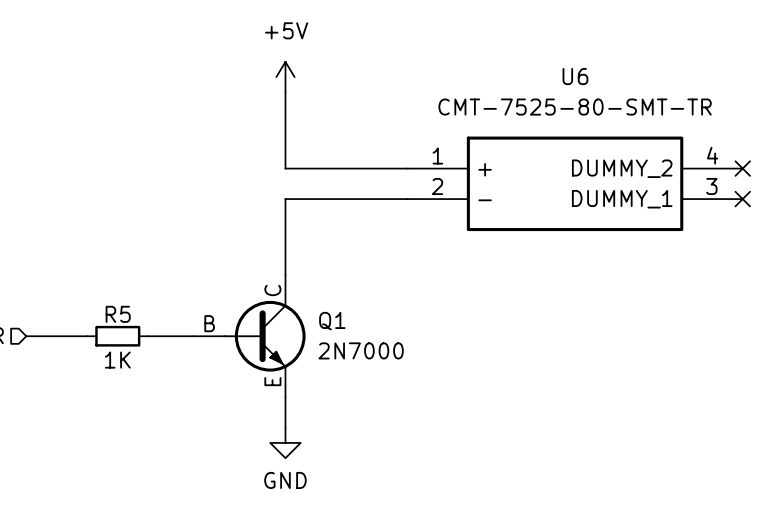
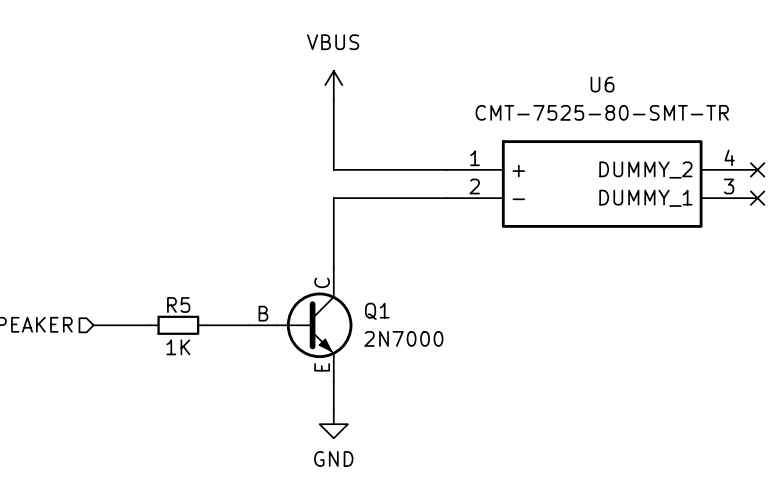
power symbol: +5V (285, 77) -> VBUS (333, 85)

